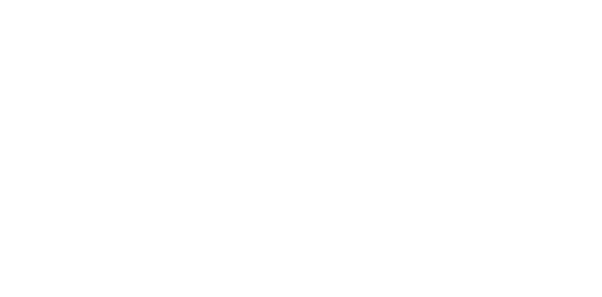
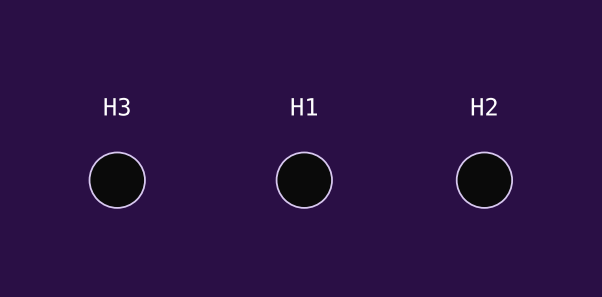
H3: none -> (117, 180)
H1: none -> (304, 180)
H2: none -> (484, 180)

